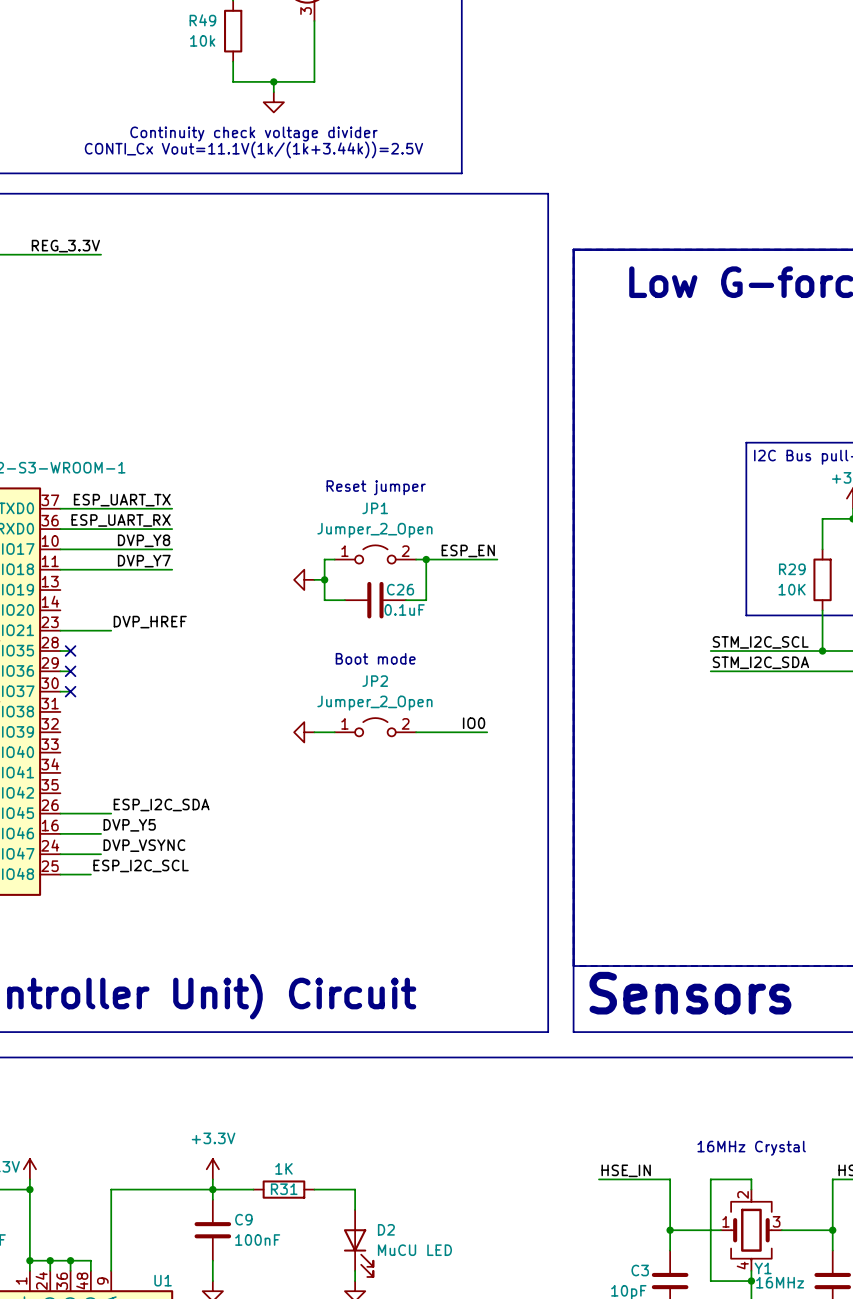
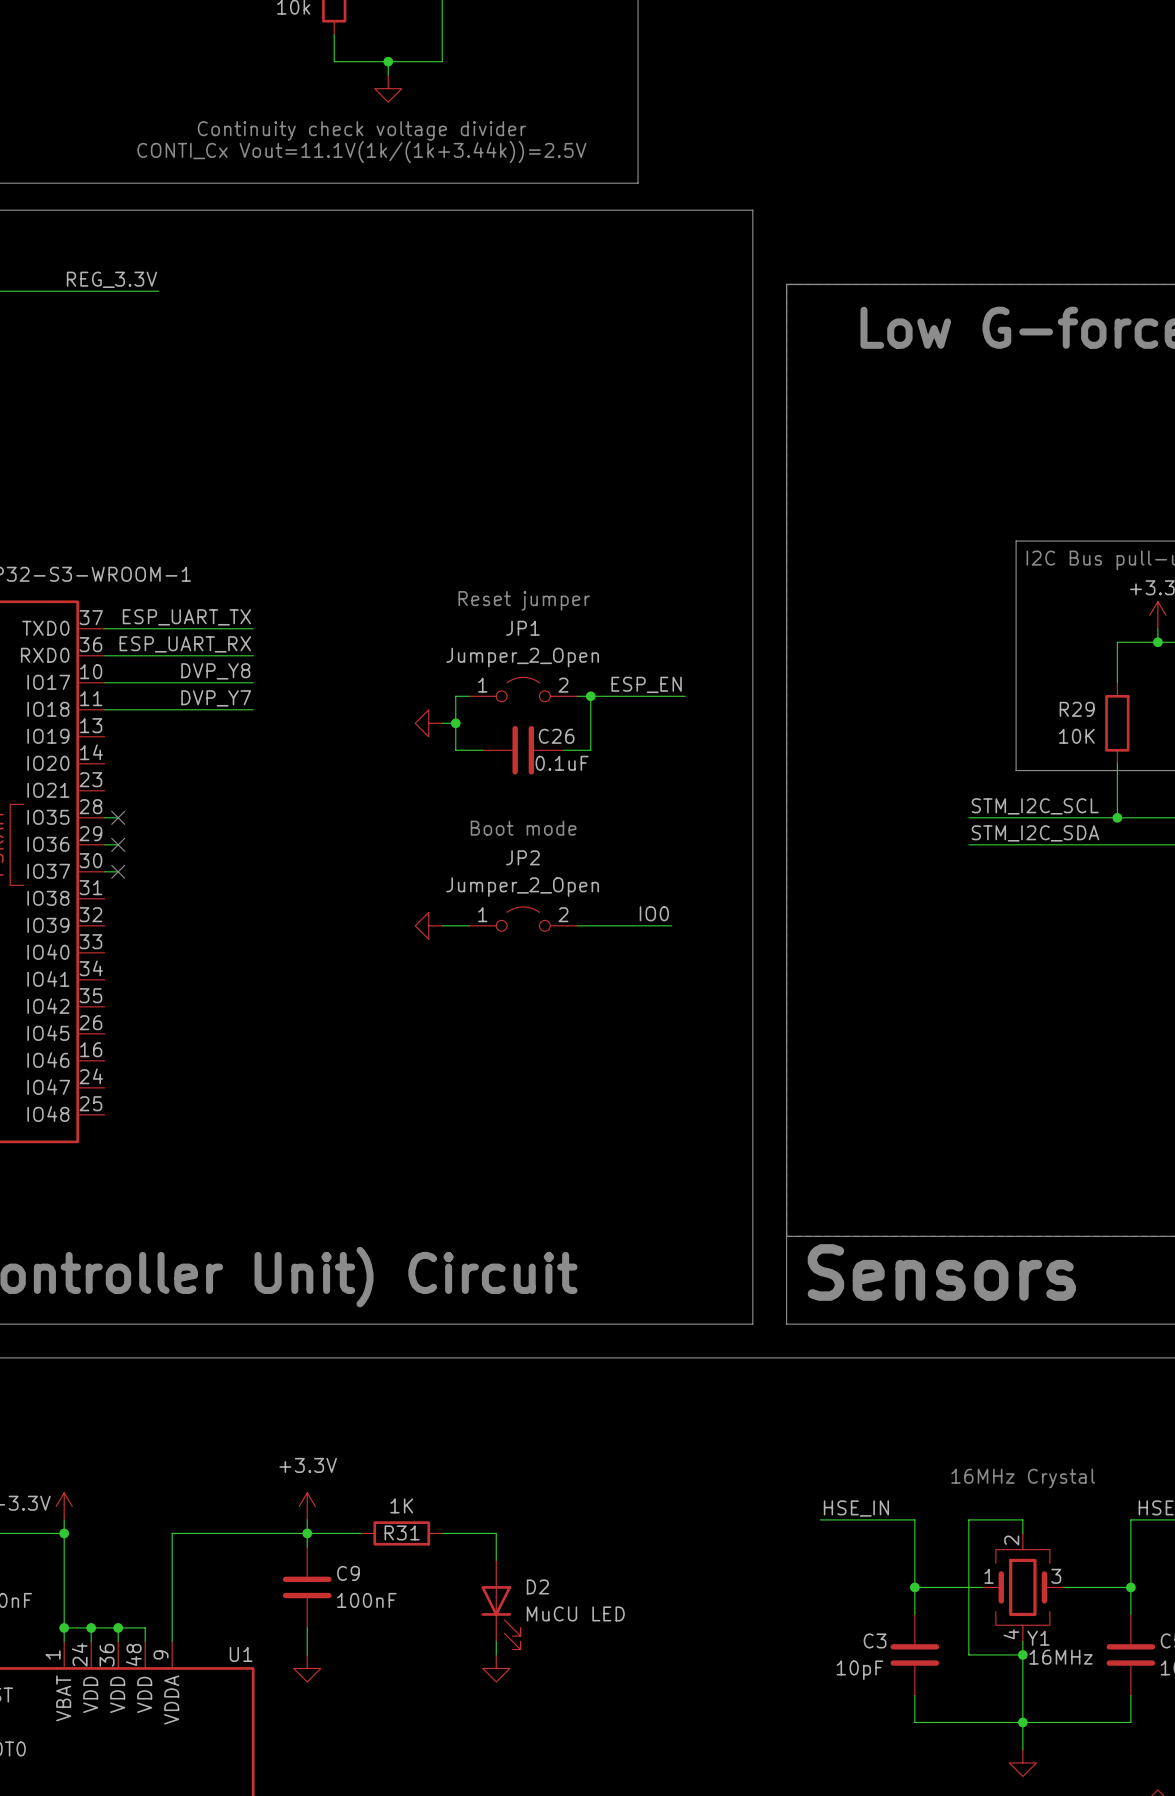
label: DVP_HREF (150, 622) -> none
wire: (60, 630) (111, 630) -> none
label: ESP_I2C_SDA (161, 805) -> none
wire: (60, 813) (111, 813) -> none
label: DVP_Y5 (129, 825) -> none
wire: (60, 833) (101, 833) -> none
label: DVP_VSYNC (144, 845) -> none
wire: (60, 854) (101, 854) -> none
label: ESP_I2C_SCL (141, 865) -> none
wire: (60, 874) (90, 874) -> none

